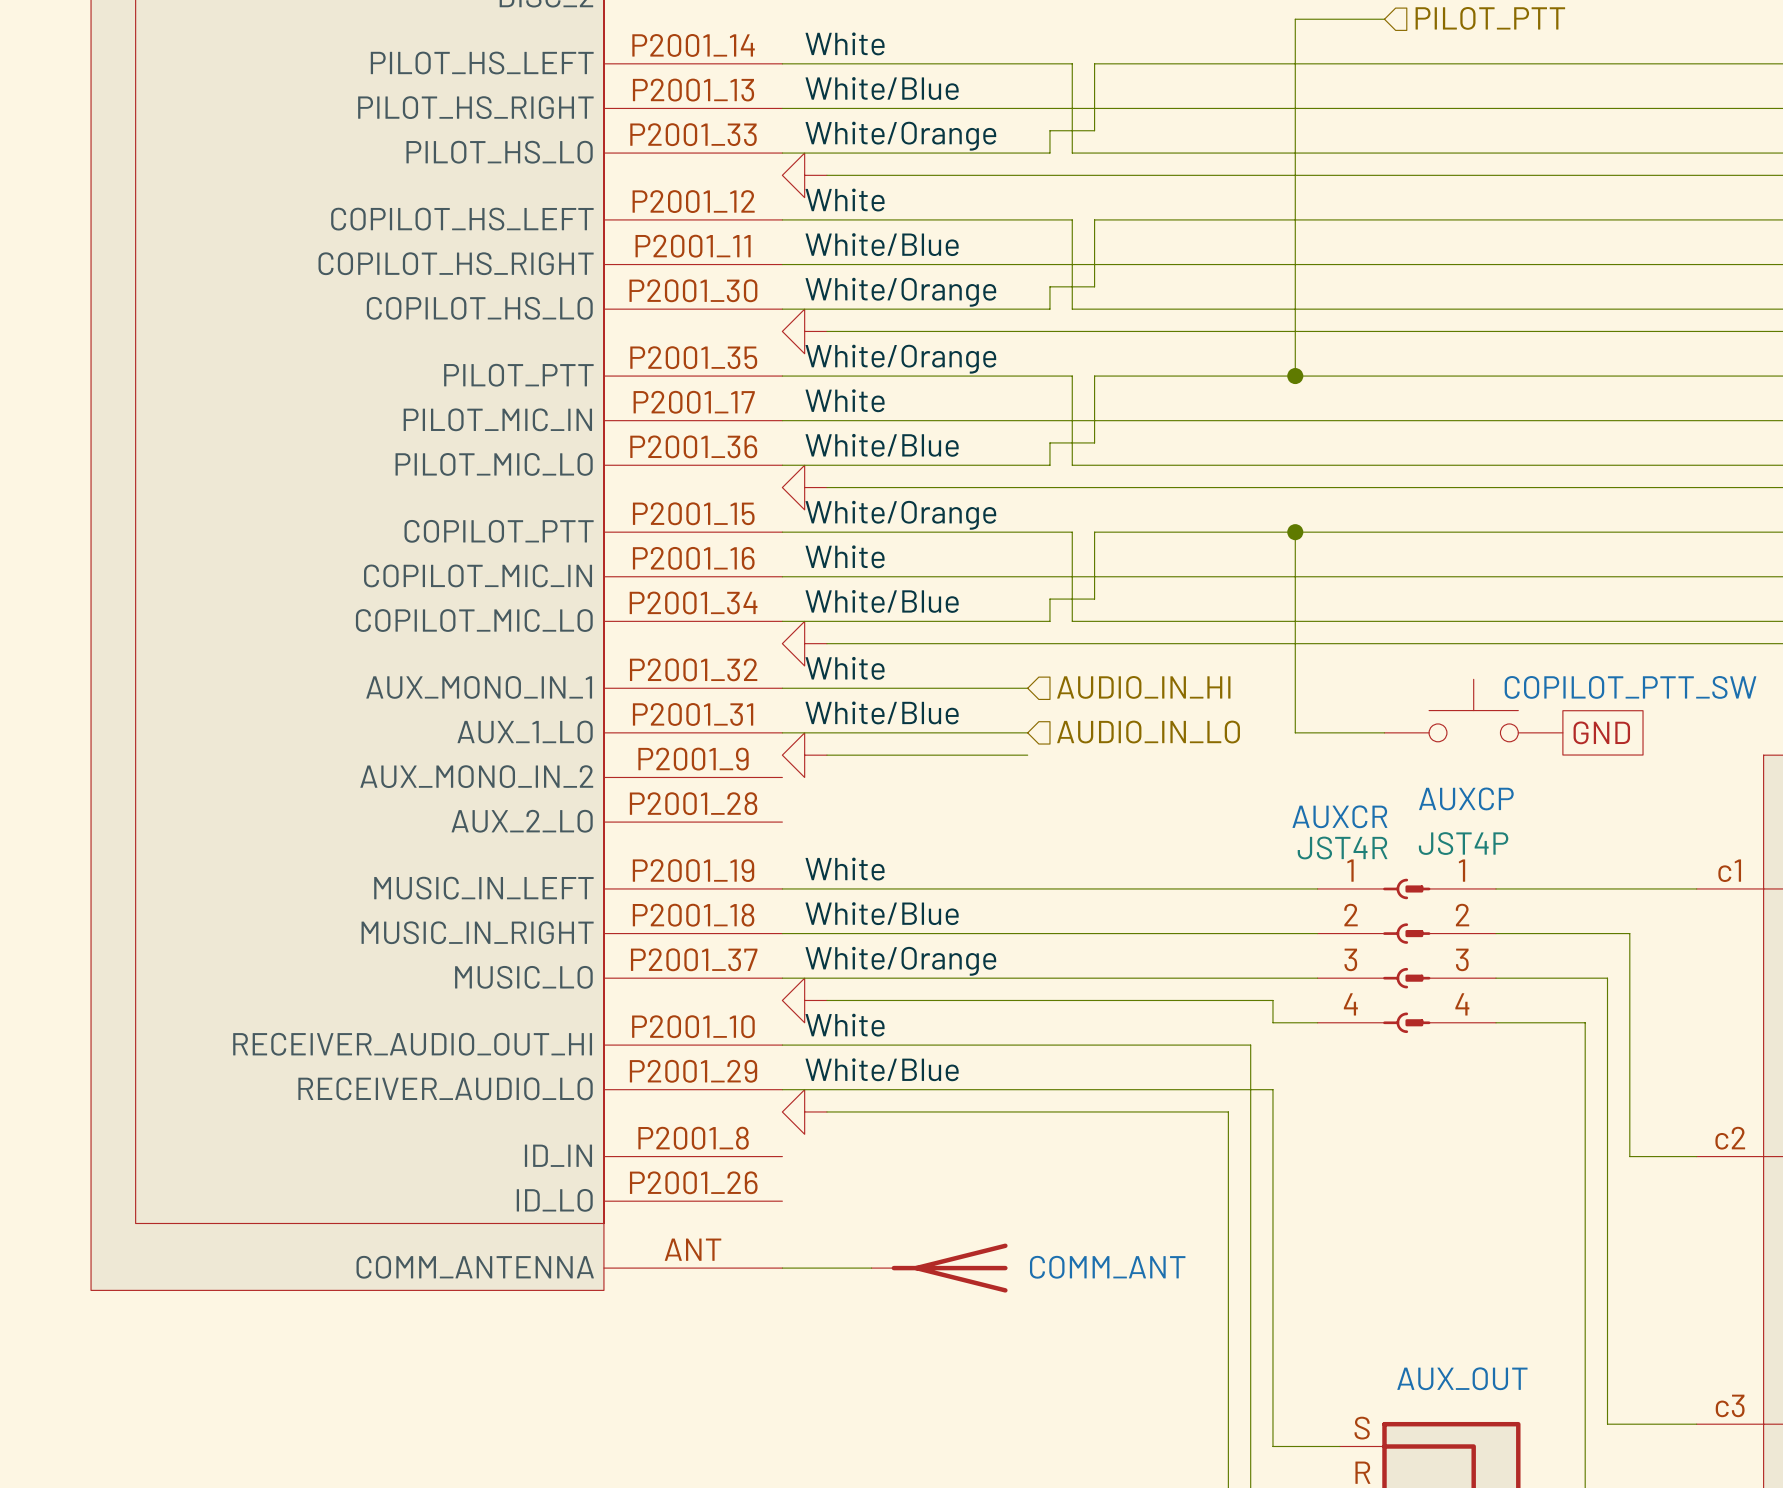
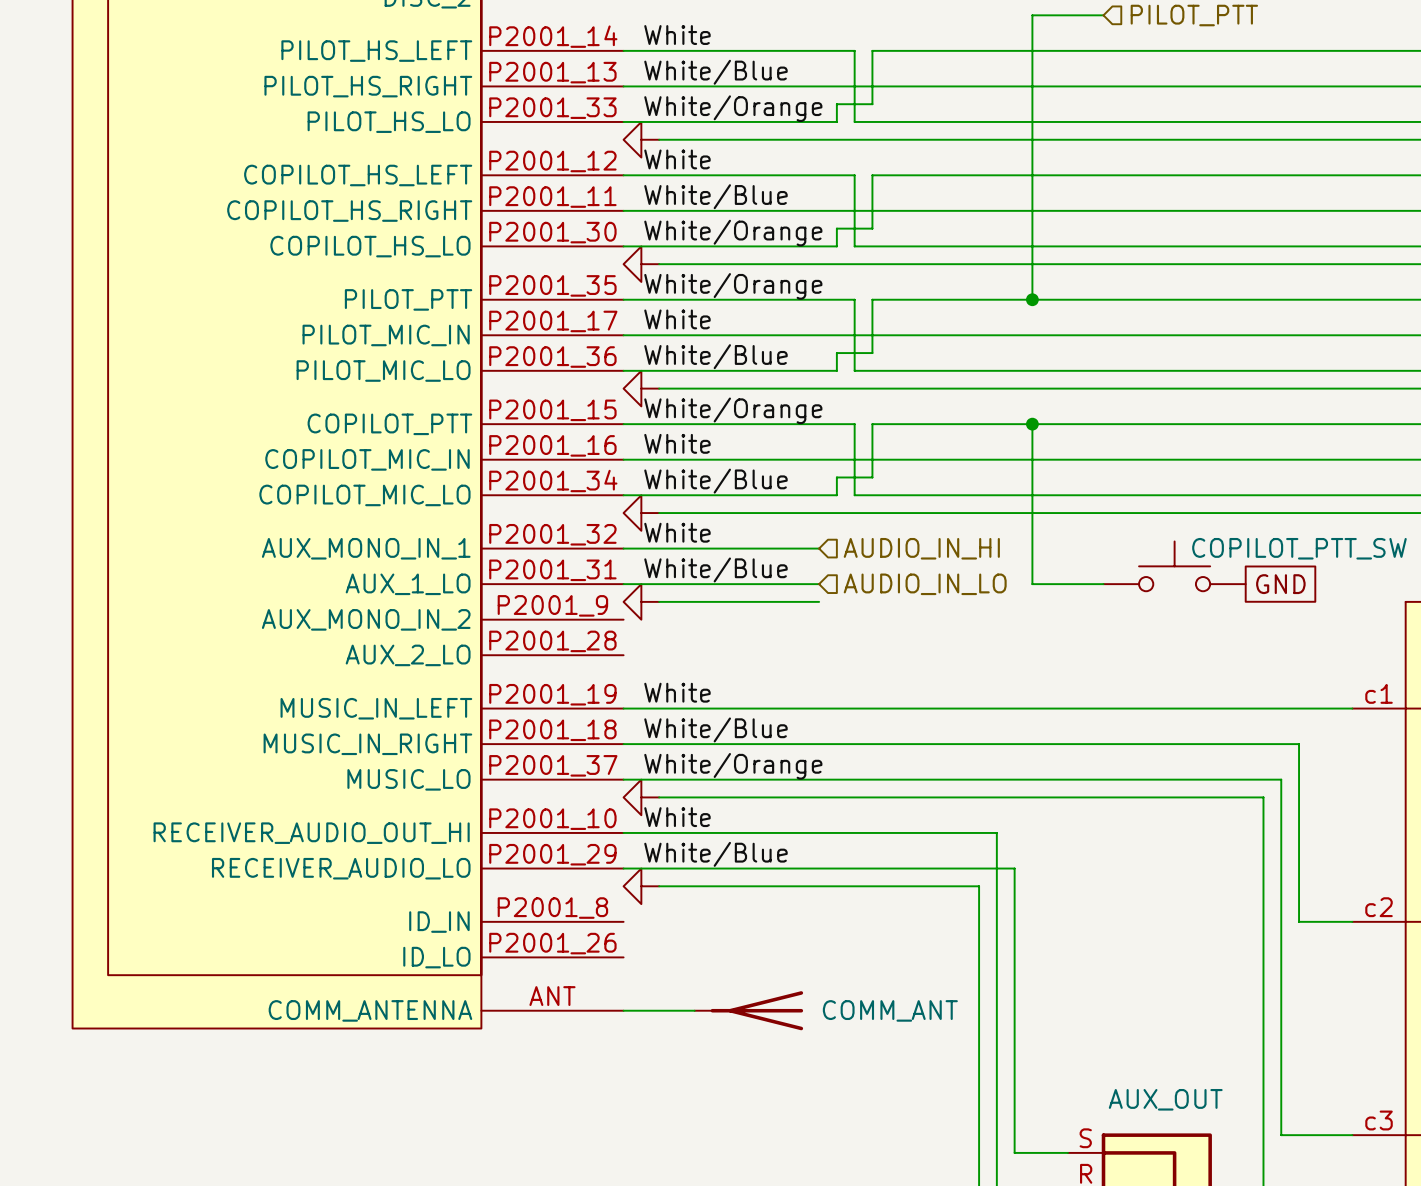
AUXCR: JST4R (1362, 955) -> none
AUXCP: JST4P (1450, 955) -> none
wire: (1272, 1000) (1272, 1022) (1317, 1022) -> none
wire: (1495, 1022) (1585, 1022) -> (1014, 797) (1263, 797) (1263, 815)

